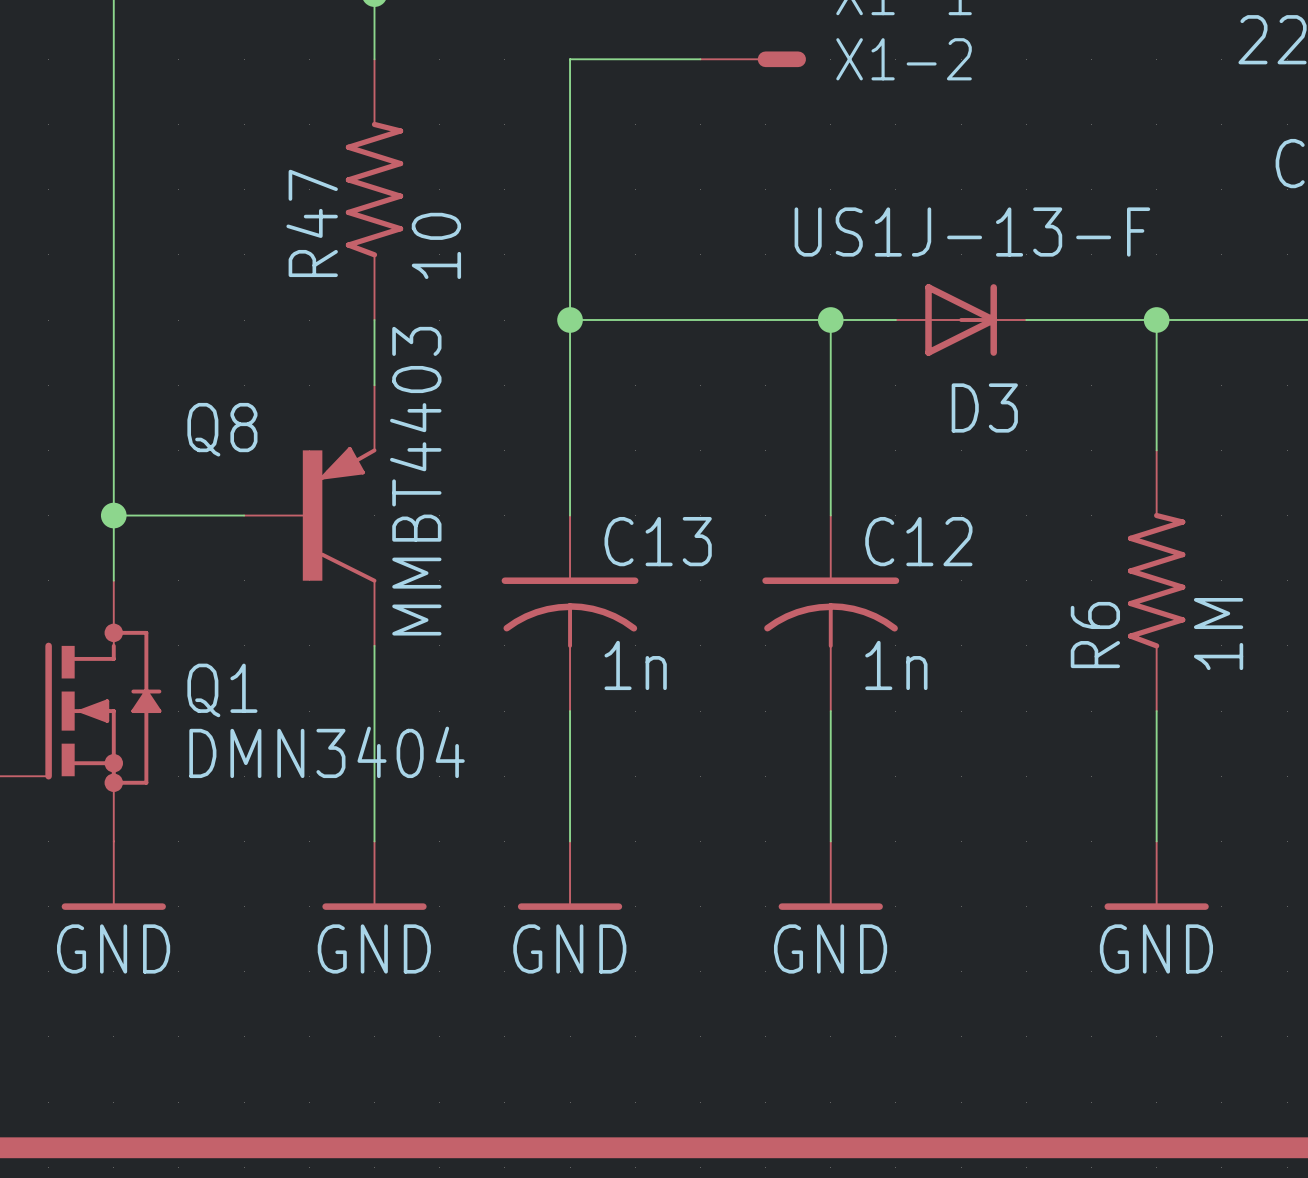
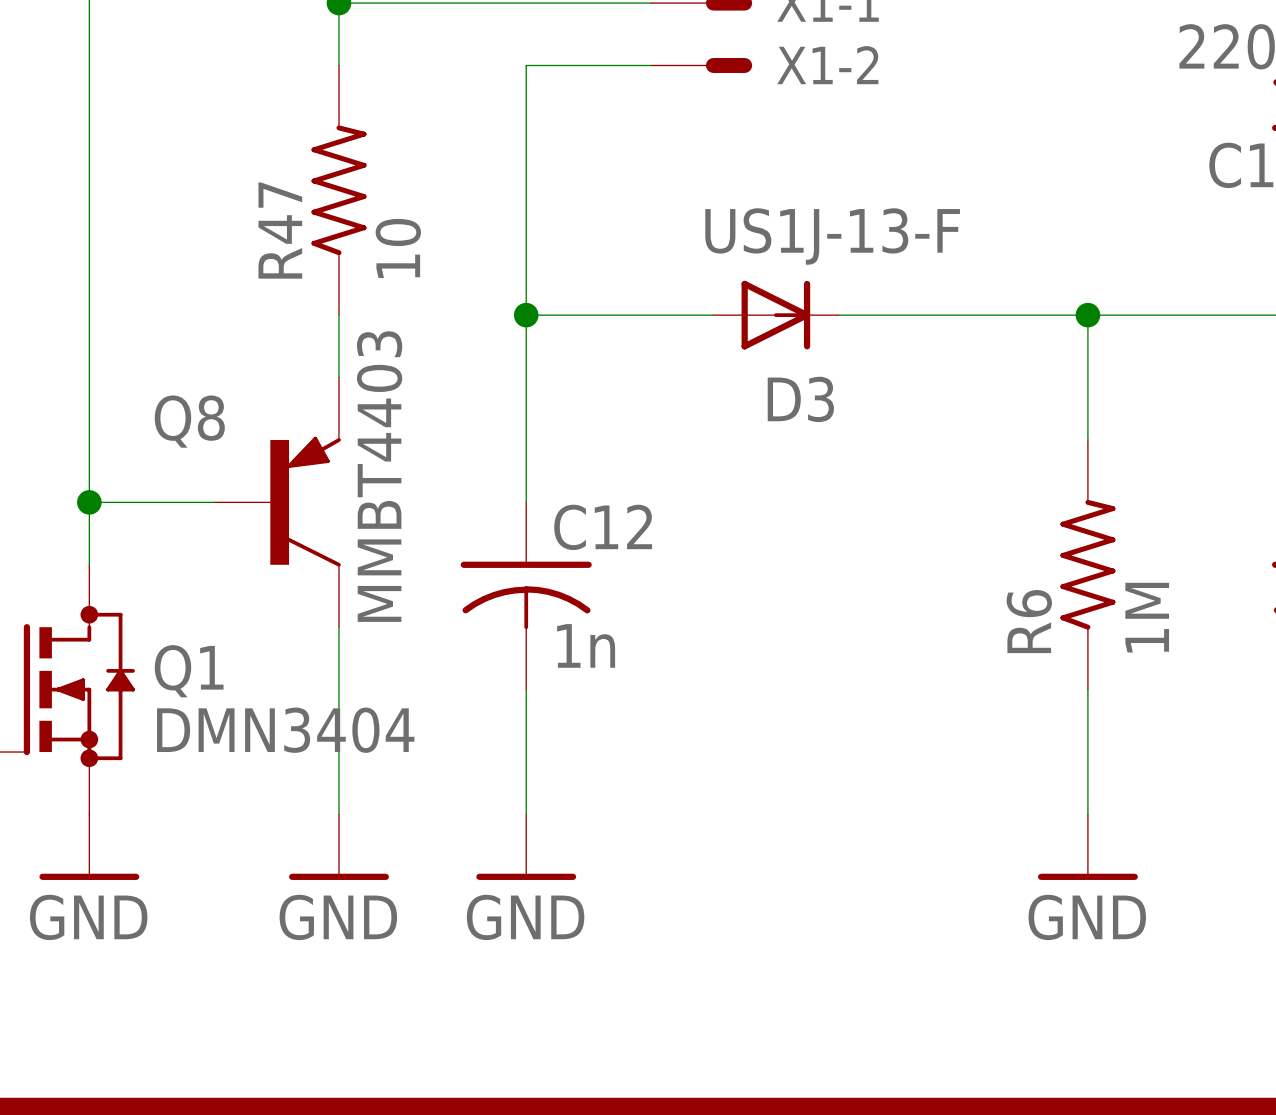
wire: (830, 320) (830, 515) -> none
junction: (830, 320) -> none
D3 position: (961, 320) -> (775, 315)
C13 name: C13 (658, 541) -> C12 (603, 527)
C12: 1n (830, 613) -> none
wire: (830, 711) (830, 841) -> none
power symbol: GND (830, 875) -> none

